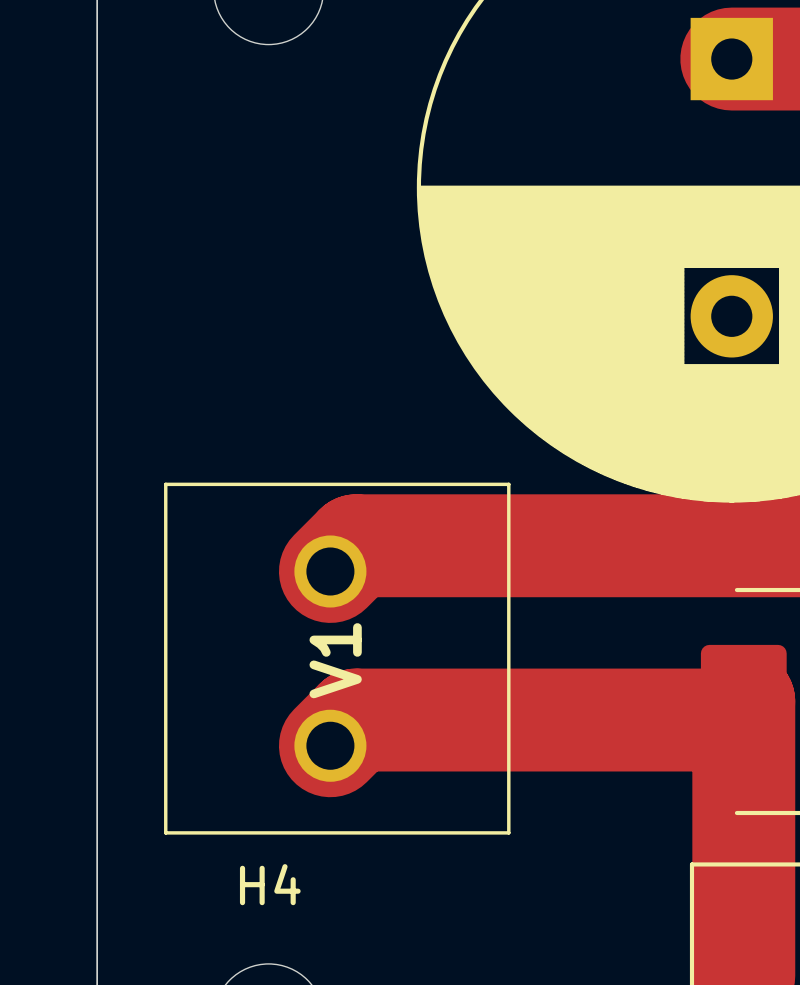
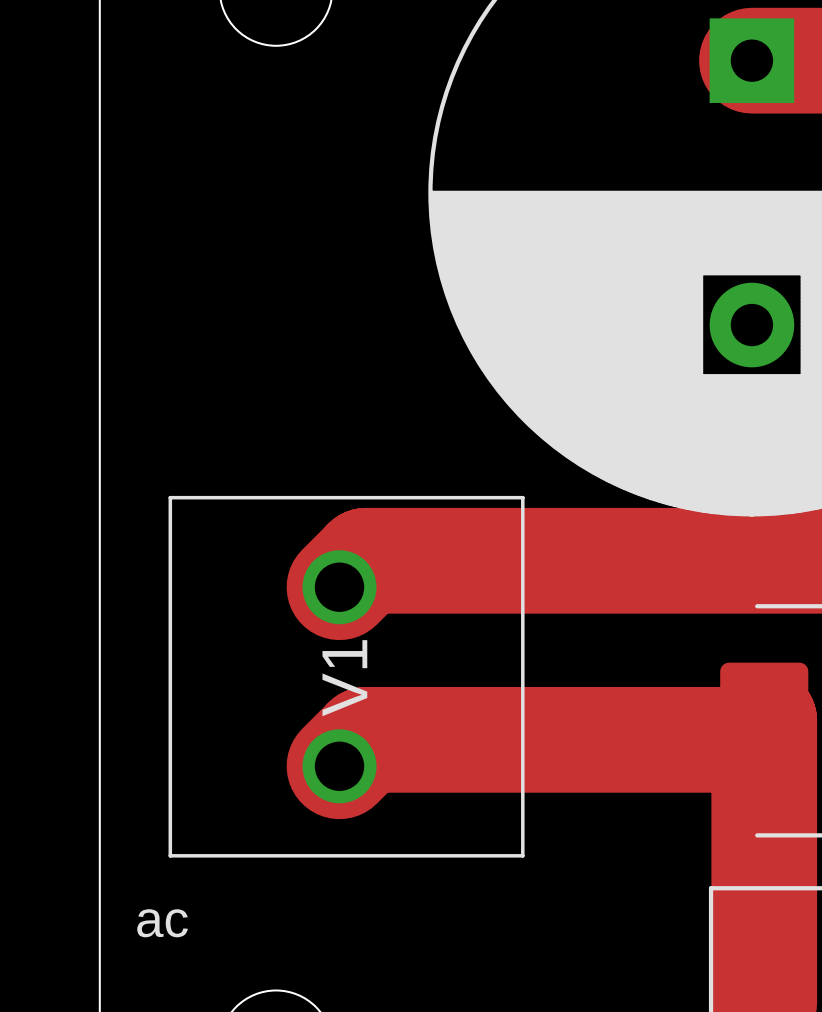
H4 name: H4 (270, 884) -> none
text: none -> ac (162, 923)

